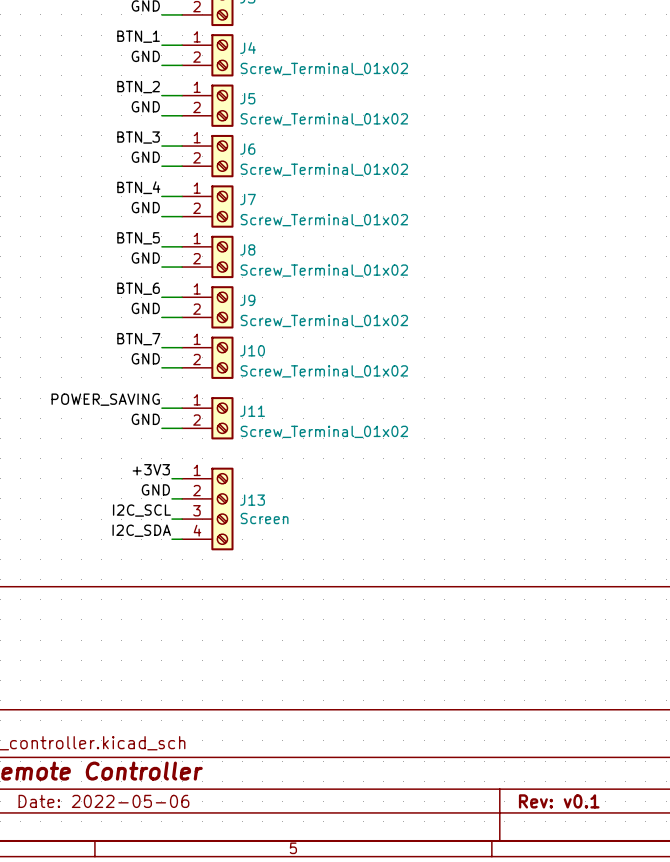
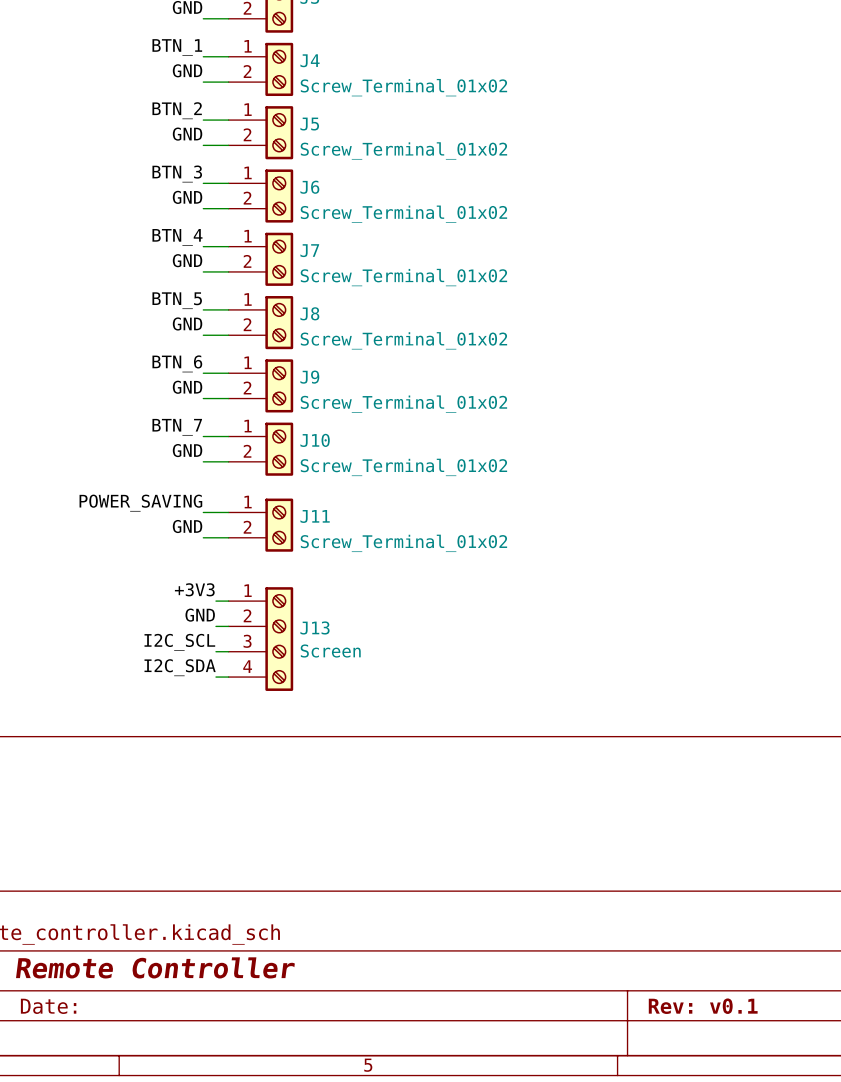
title block: Date: 2022-05-06 (103, 801) -> Date: (48, 1006)

